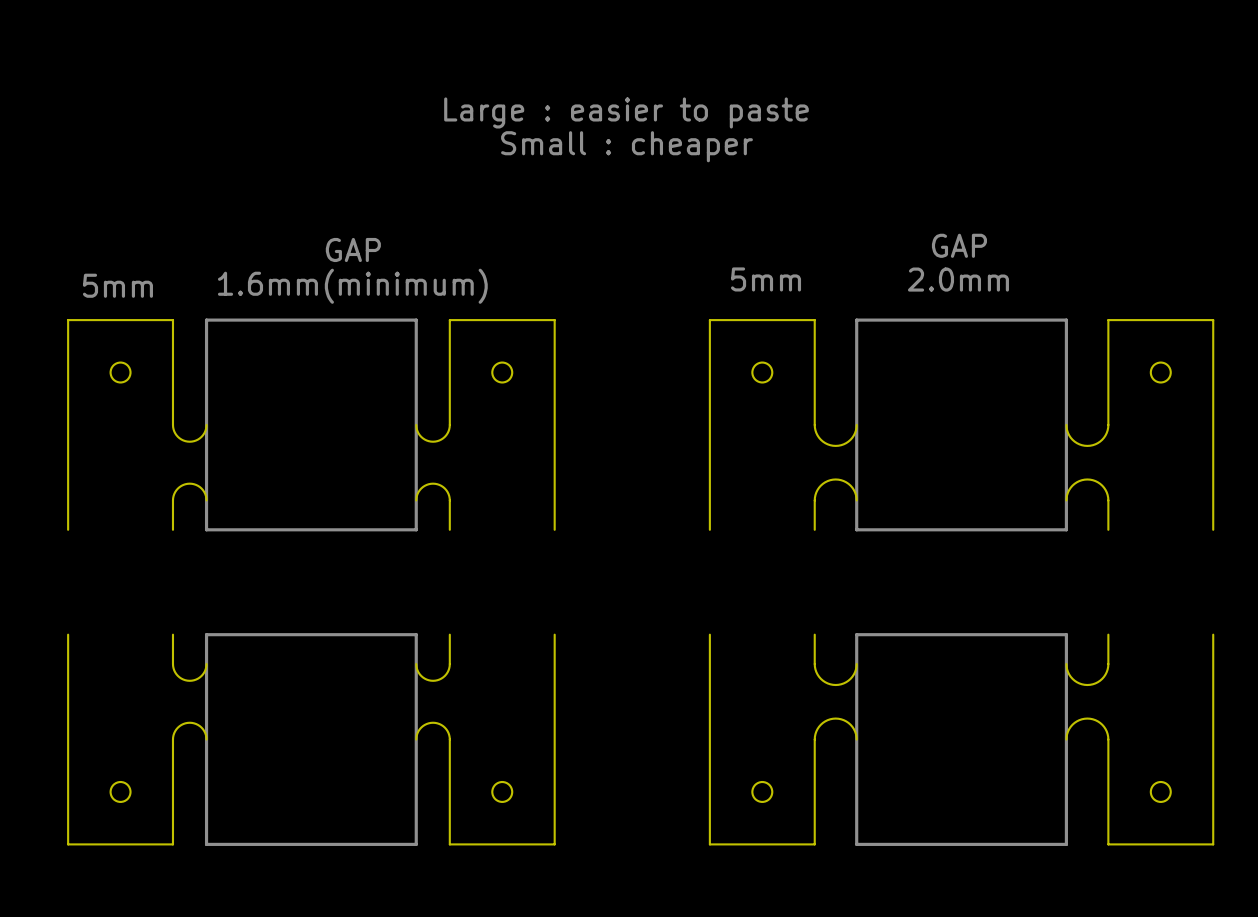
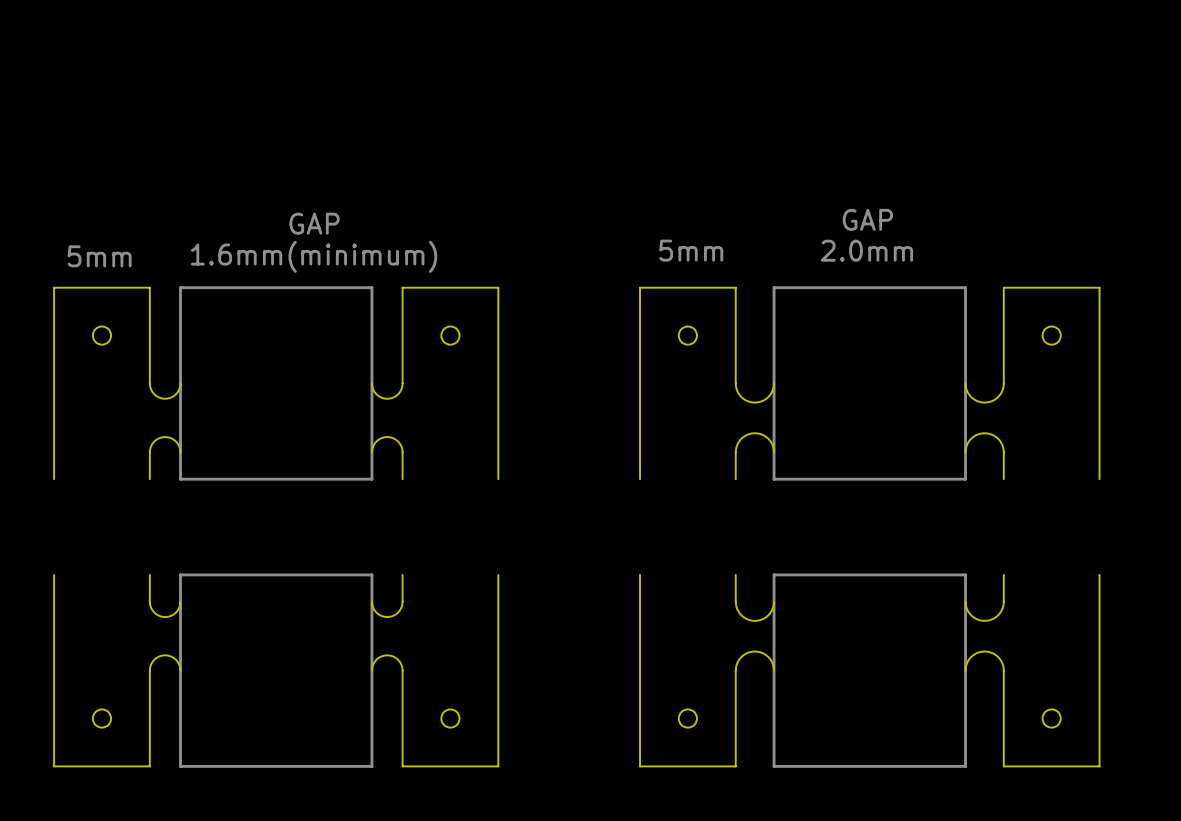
text: Large : easier to paste (626, 112) -> none
text: Small : cheaper (626, 146) -> none

